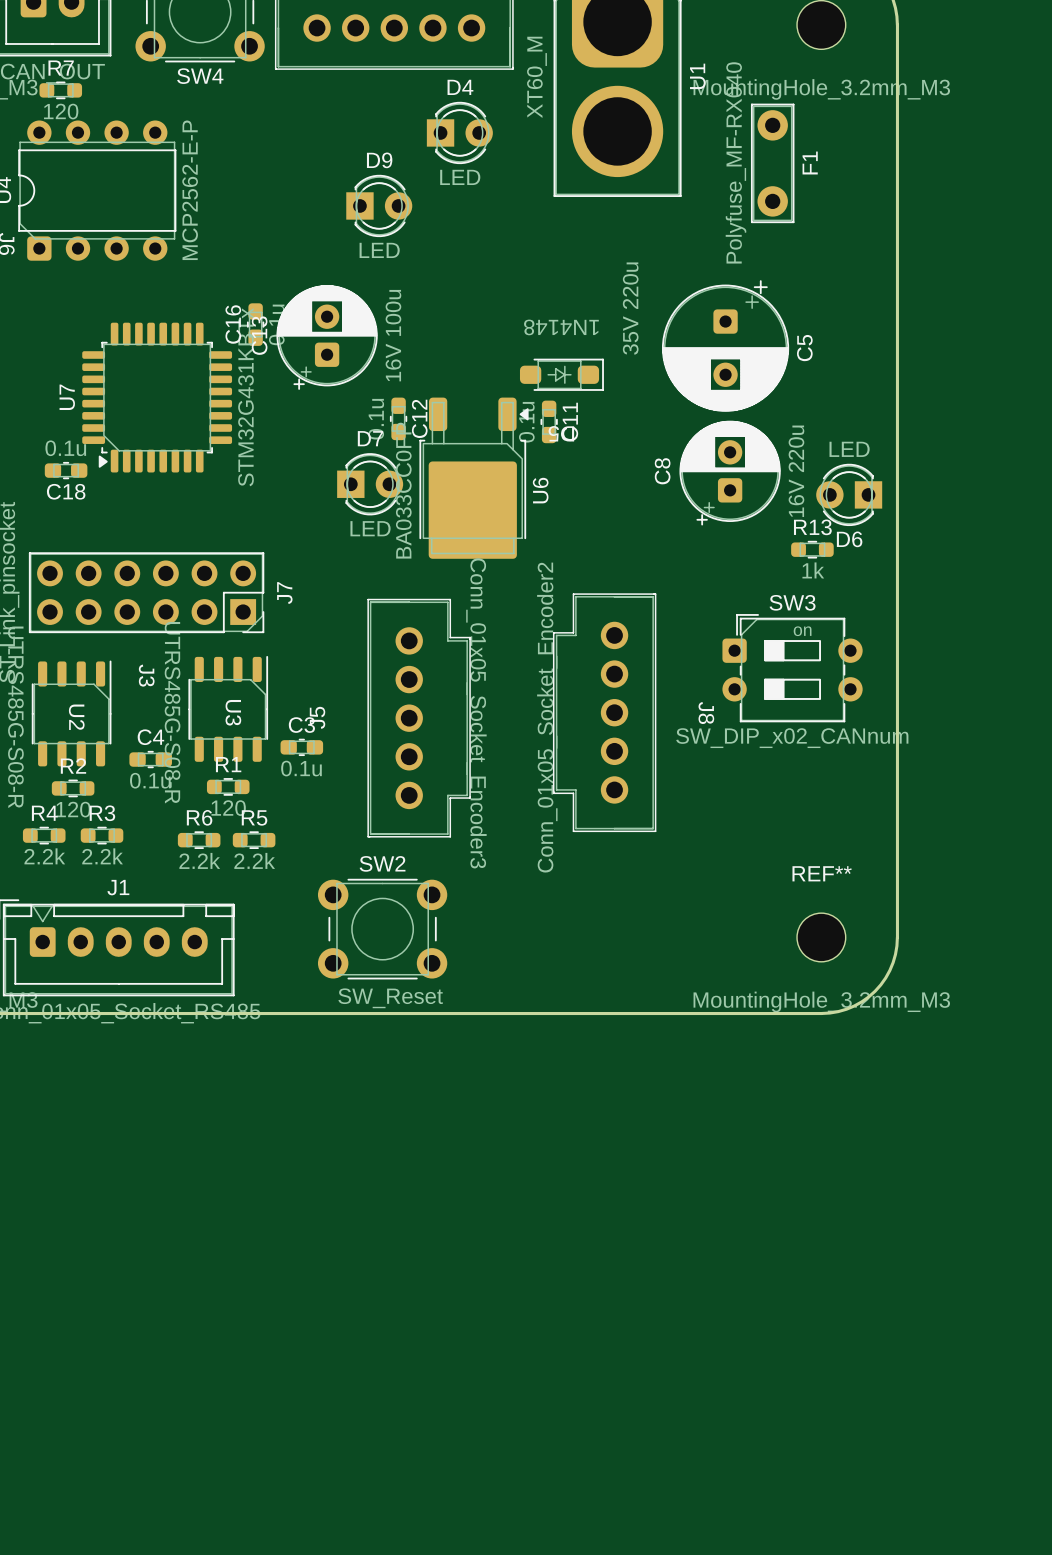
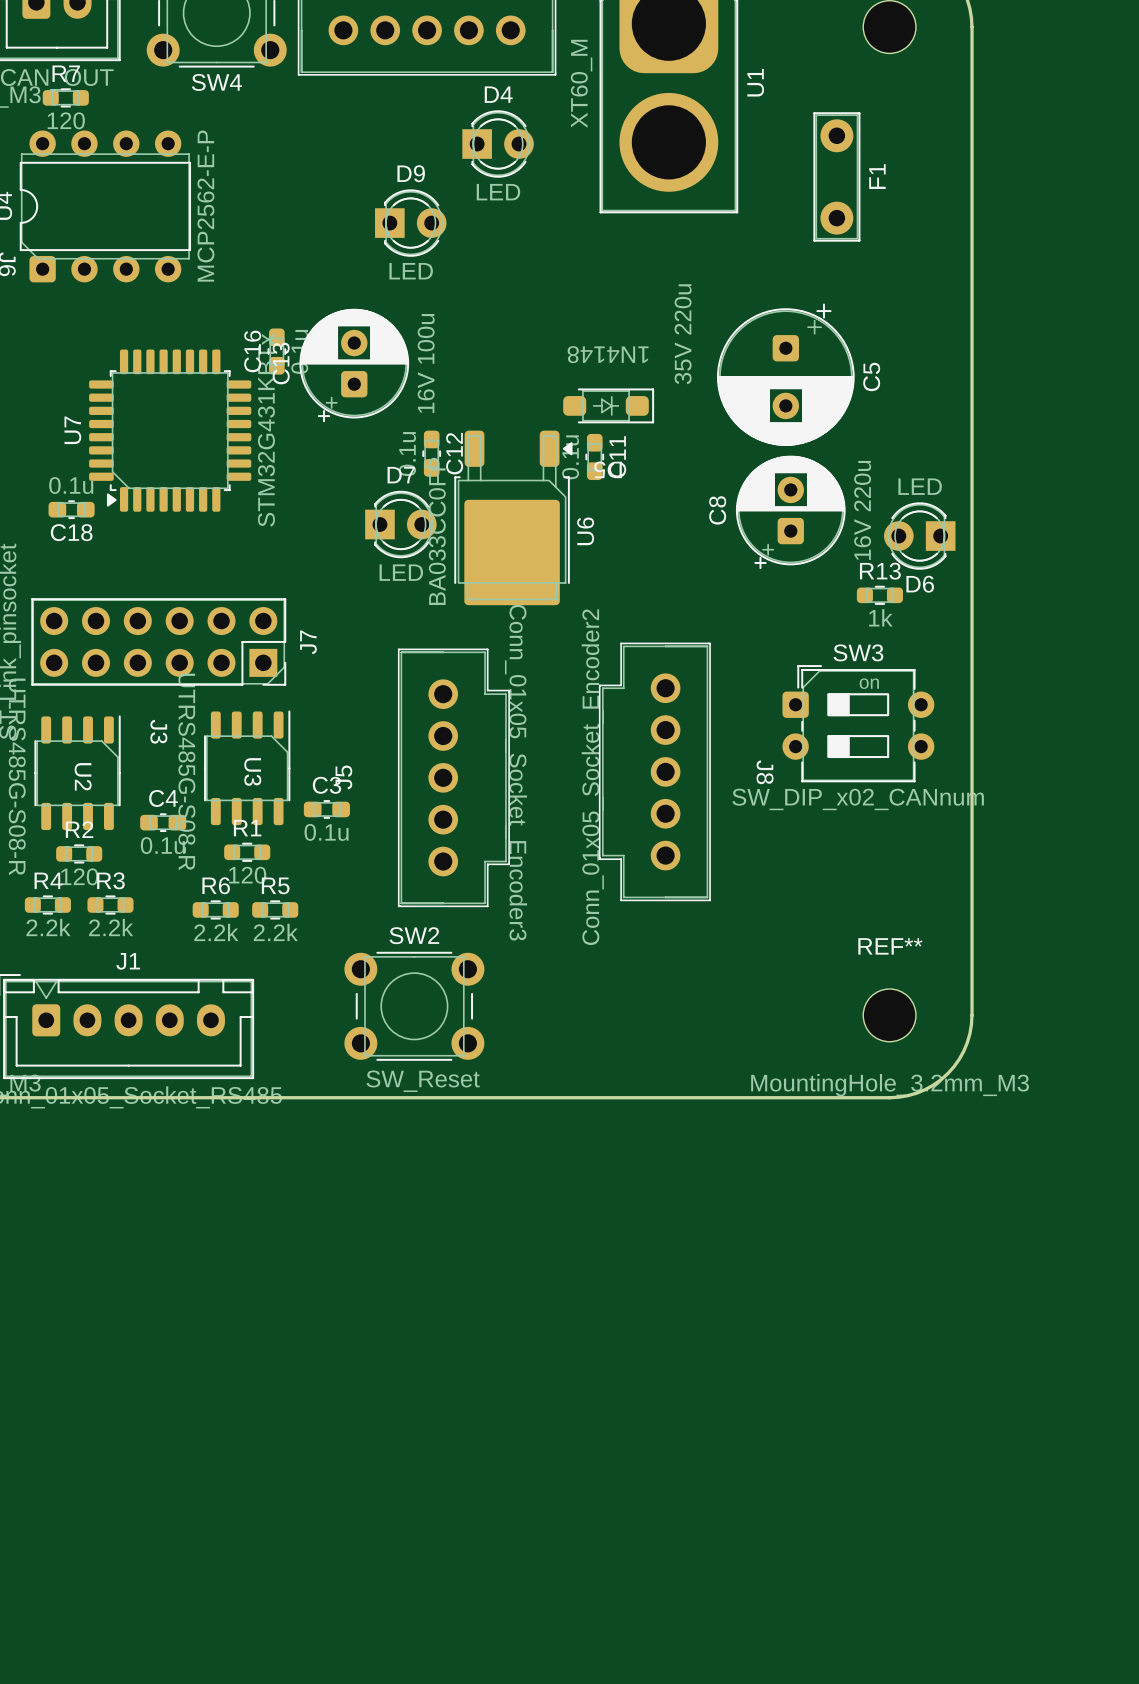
part value: MountingHole_3.2mm_M3 (821, 89) -> none
F1 value: Polyfuse_MF-RX040 (735, 162) -> none

